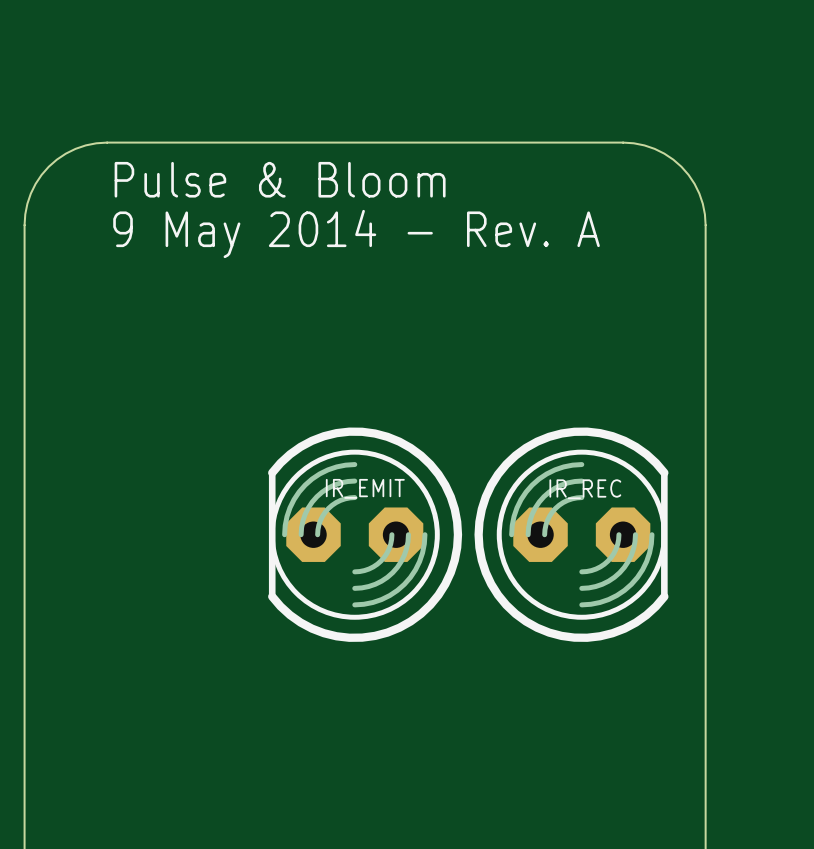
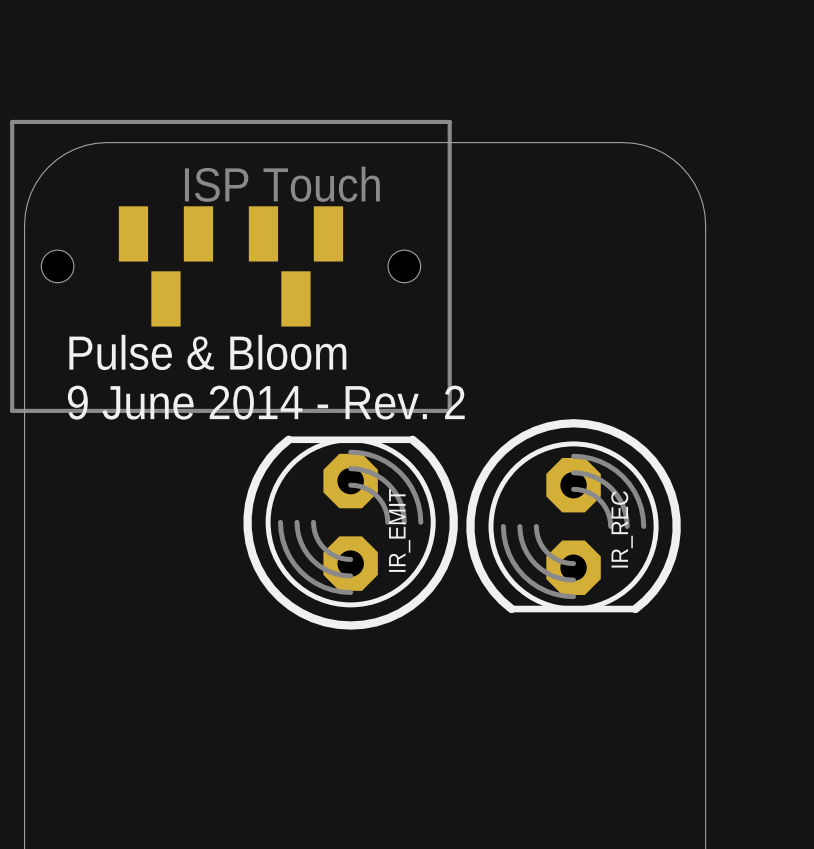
text position: Pulse & Bloom (280, 179) -> Pulse & Bloom (207, 352)
text: 9 May 2014 - Rev. A (356, 233) -> none
part: none -> ISP Touch (230, 266)
text: none -> 9 June 2014 - Rev. 2 (266, 402)
IR_EMIT rotation: 0° (365, 534) -> 90° clockwise (350, 532)
IR_REC rotation: 0° (571, 534) -> 90° clockwise (573, 516)

